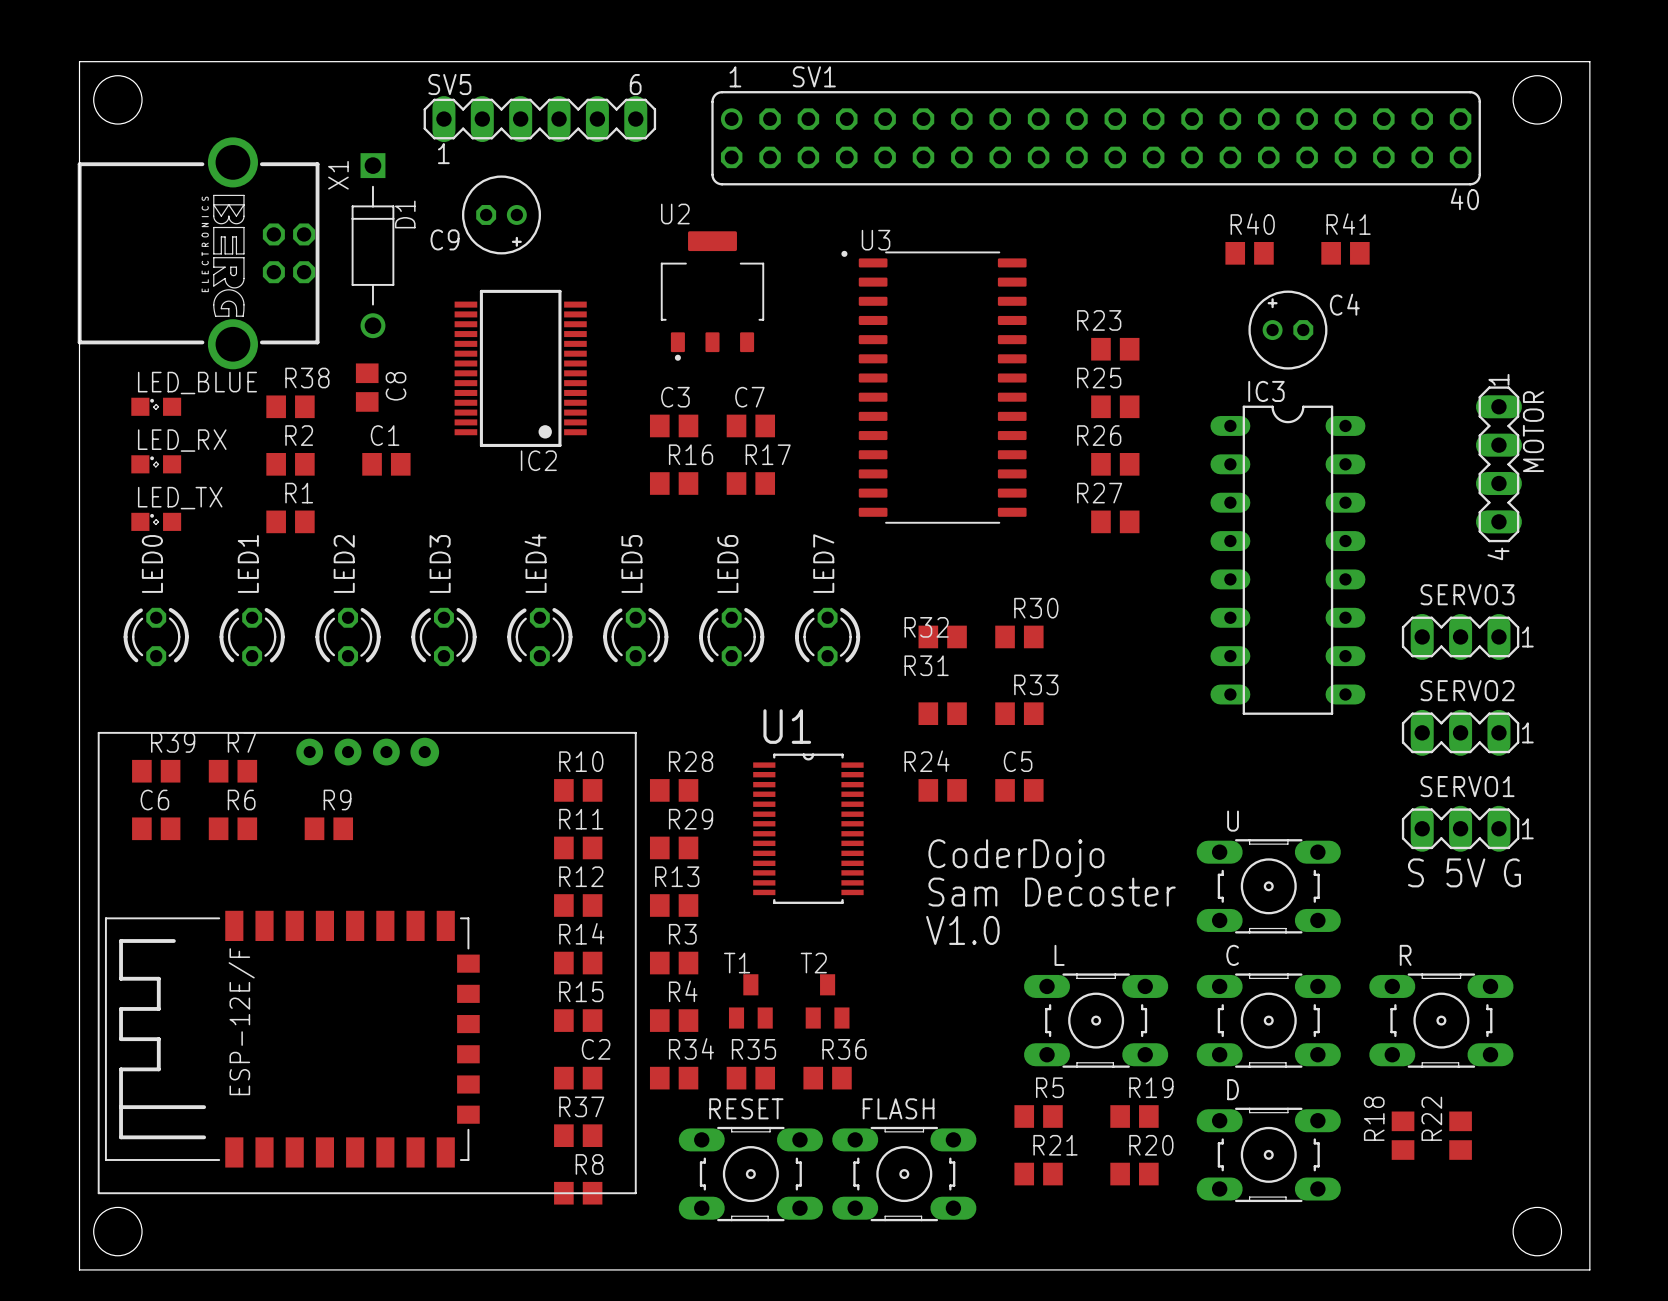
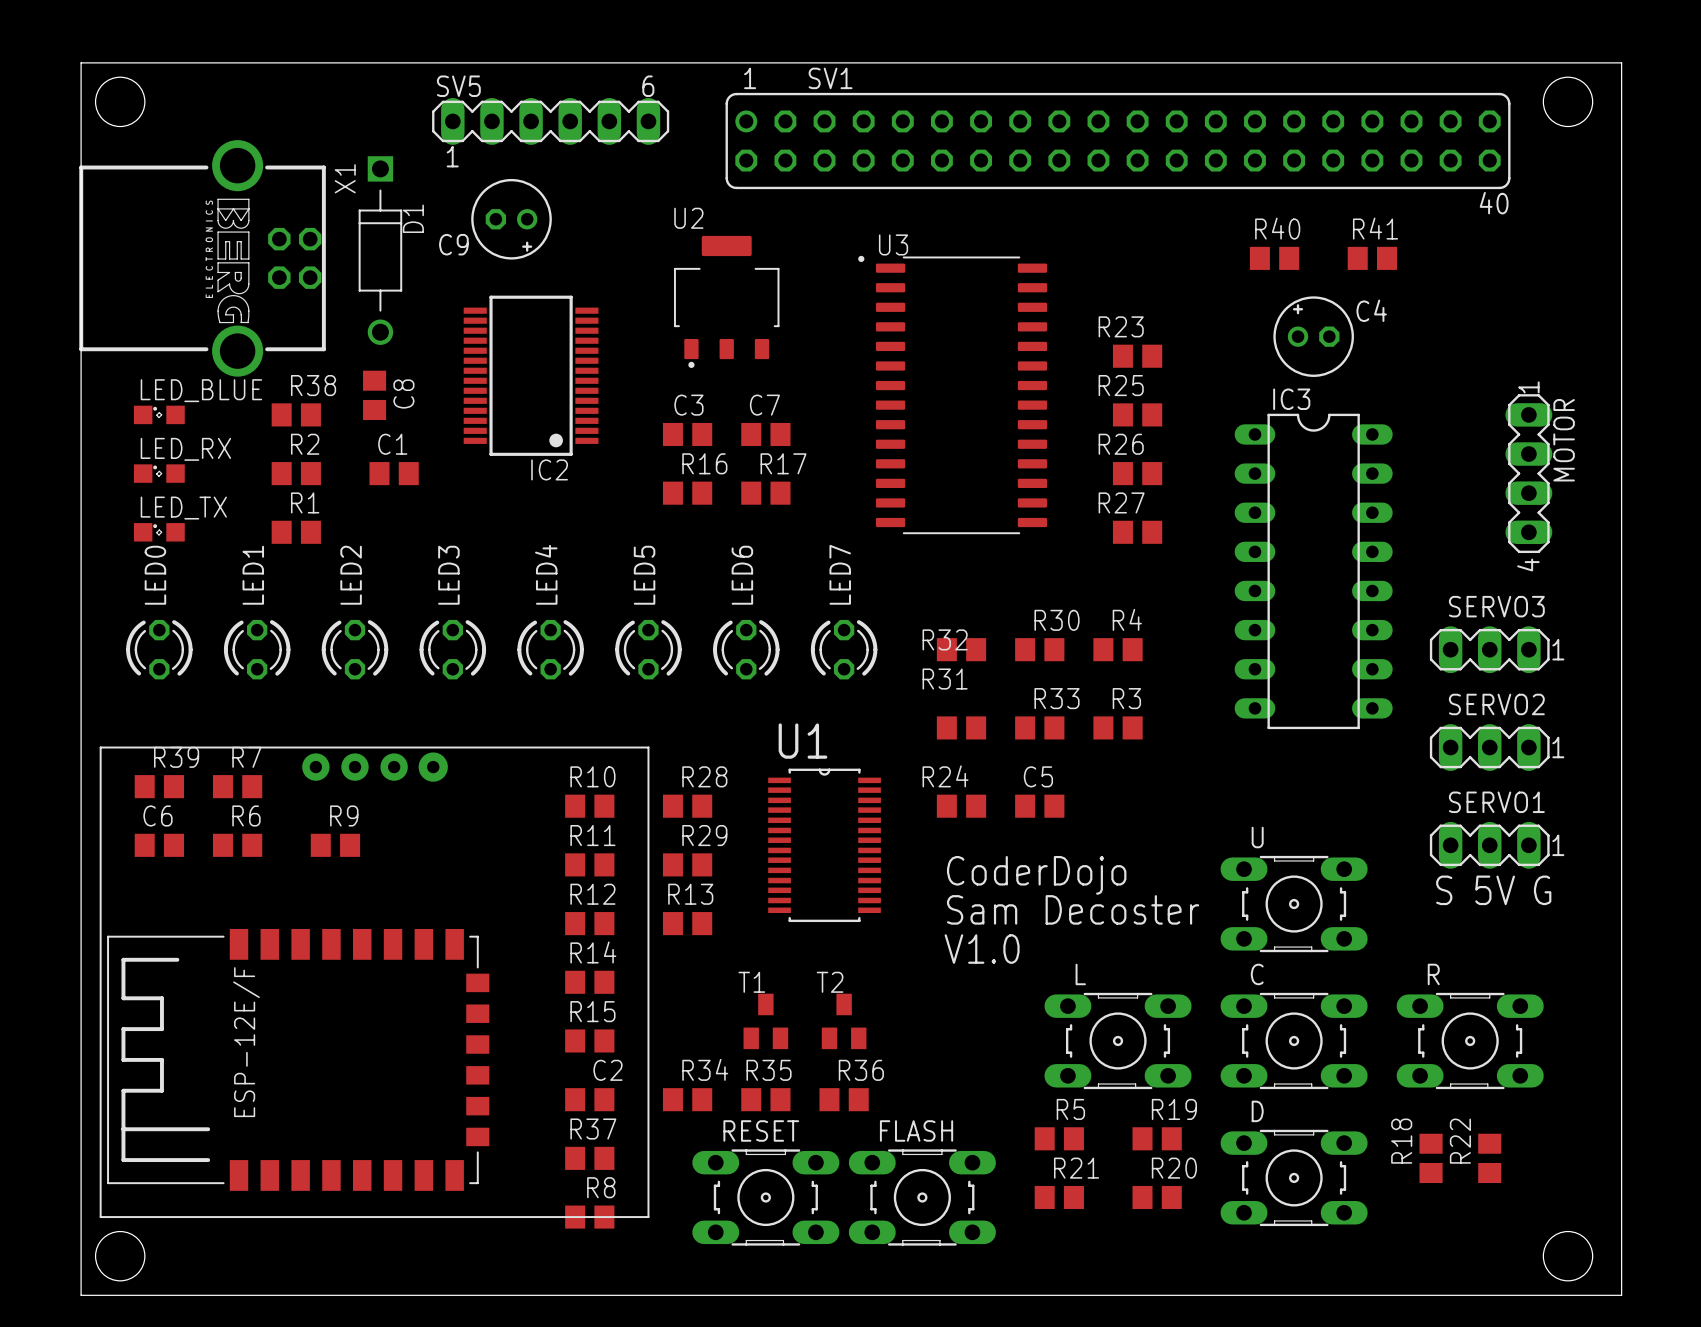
R3 position: (674, 963) -> (1118, 727)
R4 position: (674, 1020) -> (1118, 649)

